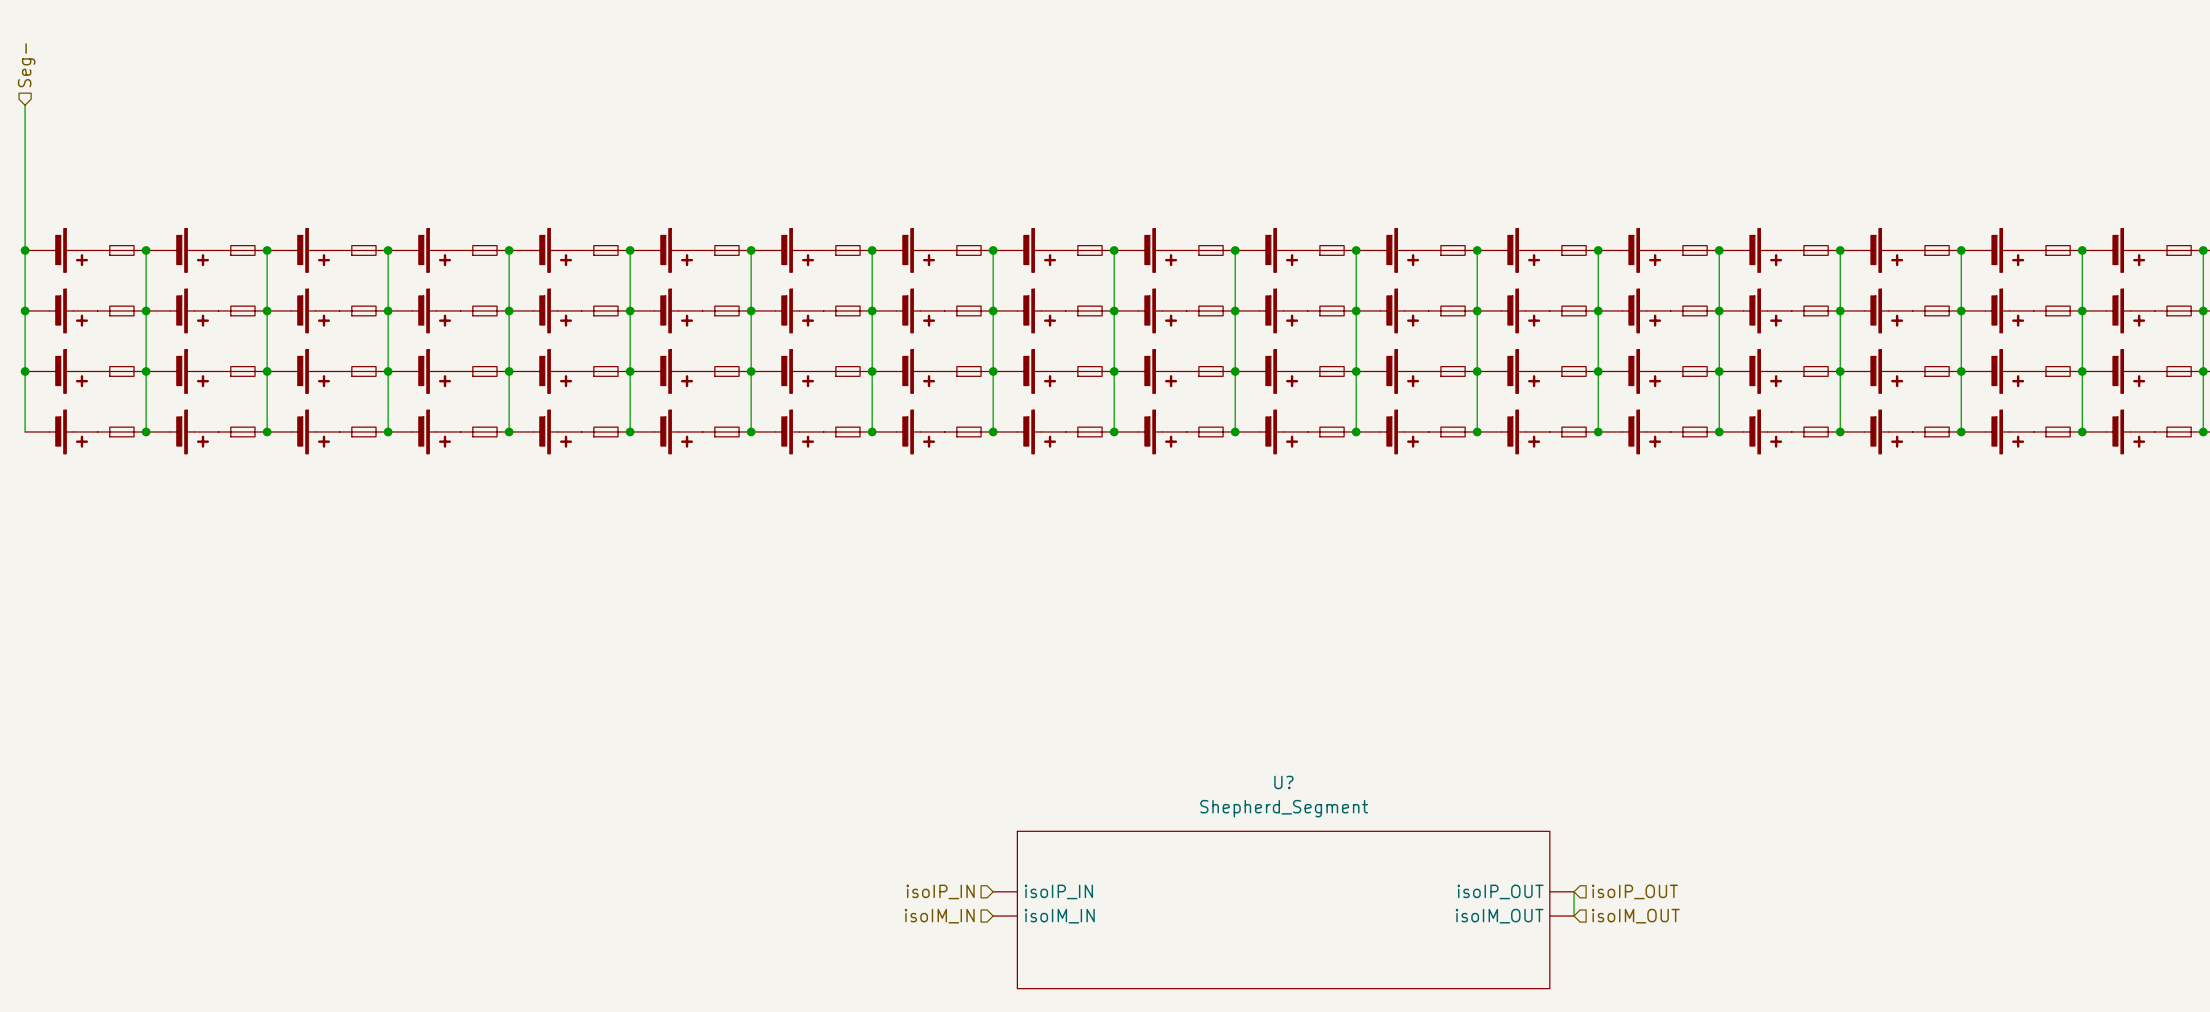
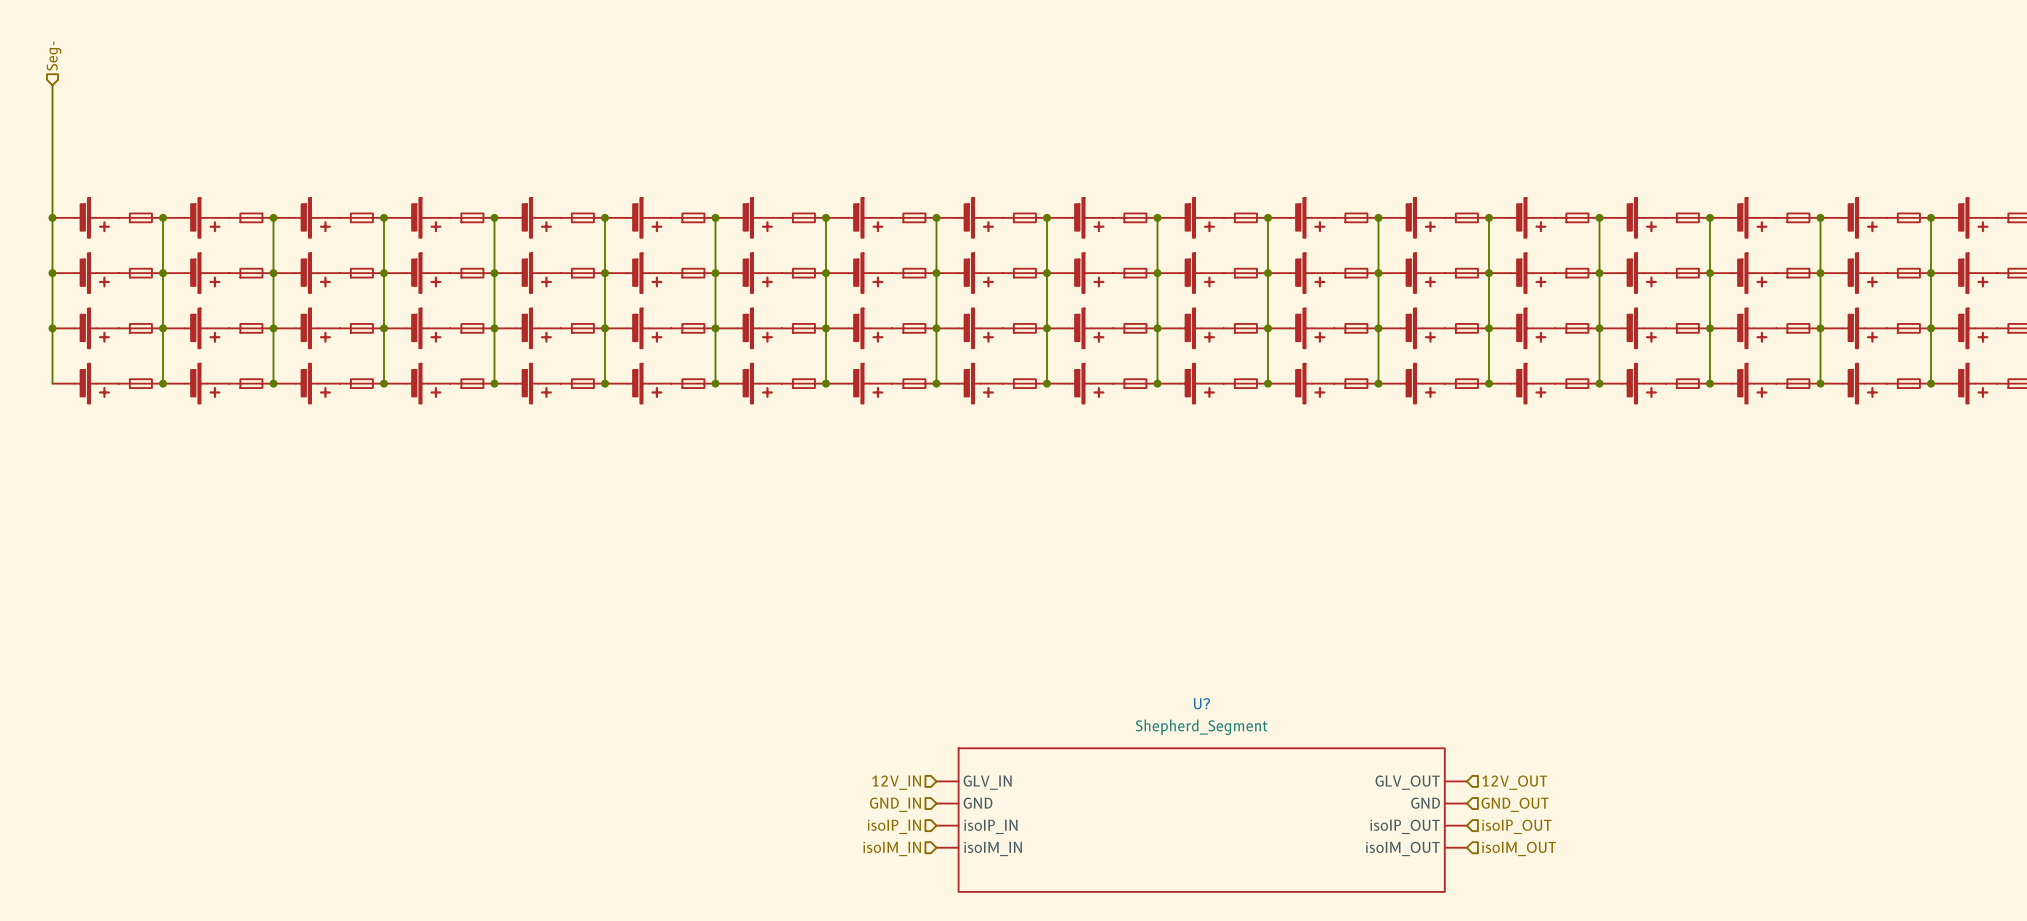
U? symbol: [993, 831, 1575, 989] -> [936, 748, 1467, 892]
hierarchical label: none -> 12V_IN (896, 782)
hierarchical label: none -> 12V_OUT (1514, 782)
hierarchical label: isoIP_IN (940, 891) -> GND_IN (895, 804)
wire: (1574, 891) (1574, 916) -> none
hierarchical label: isoIP_OUT (1635, 891) -> GND_OUT (1515, 804)
hierarchical label: isoIM_IN (939, 916) -> isoIP_IN (894, 826)
hierarchical label: isoIM_OUT (1635, 916) -> isoIP_OUT (1516, 826)
hierarchical label: none -> isoIM_IN (892, 848)
hierarchical label: none -> isoIM_OUT (1519, 848)

